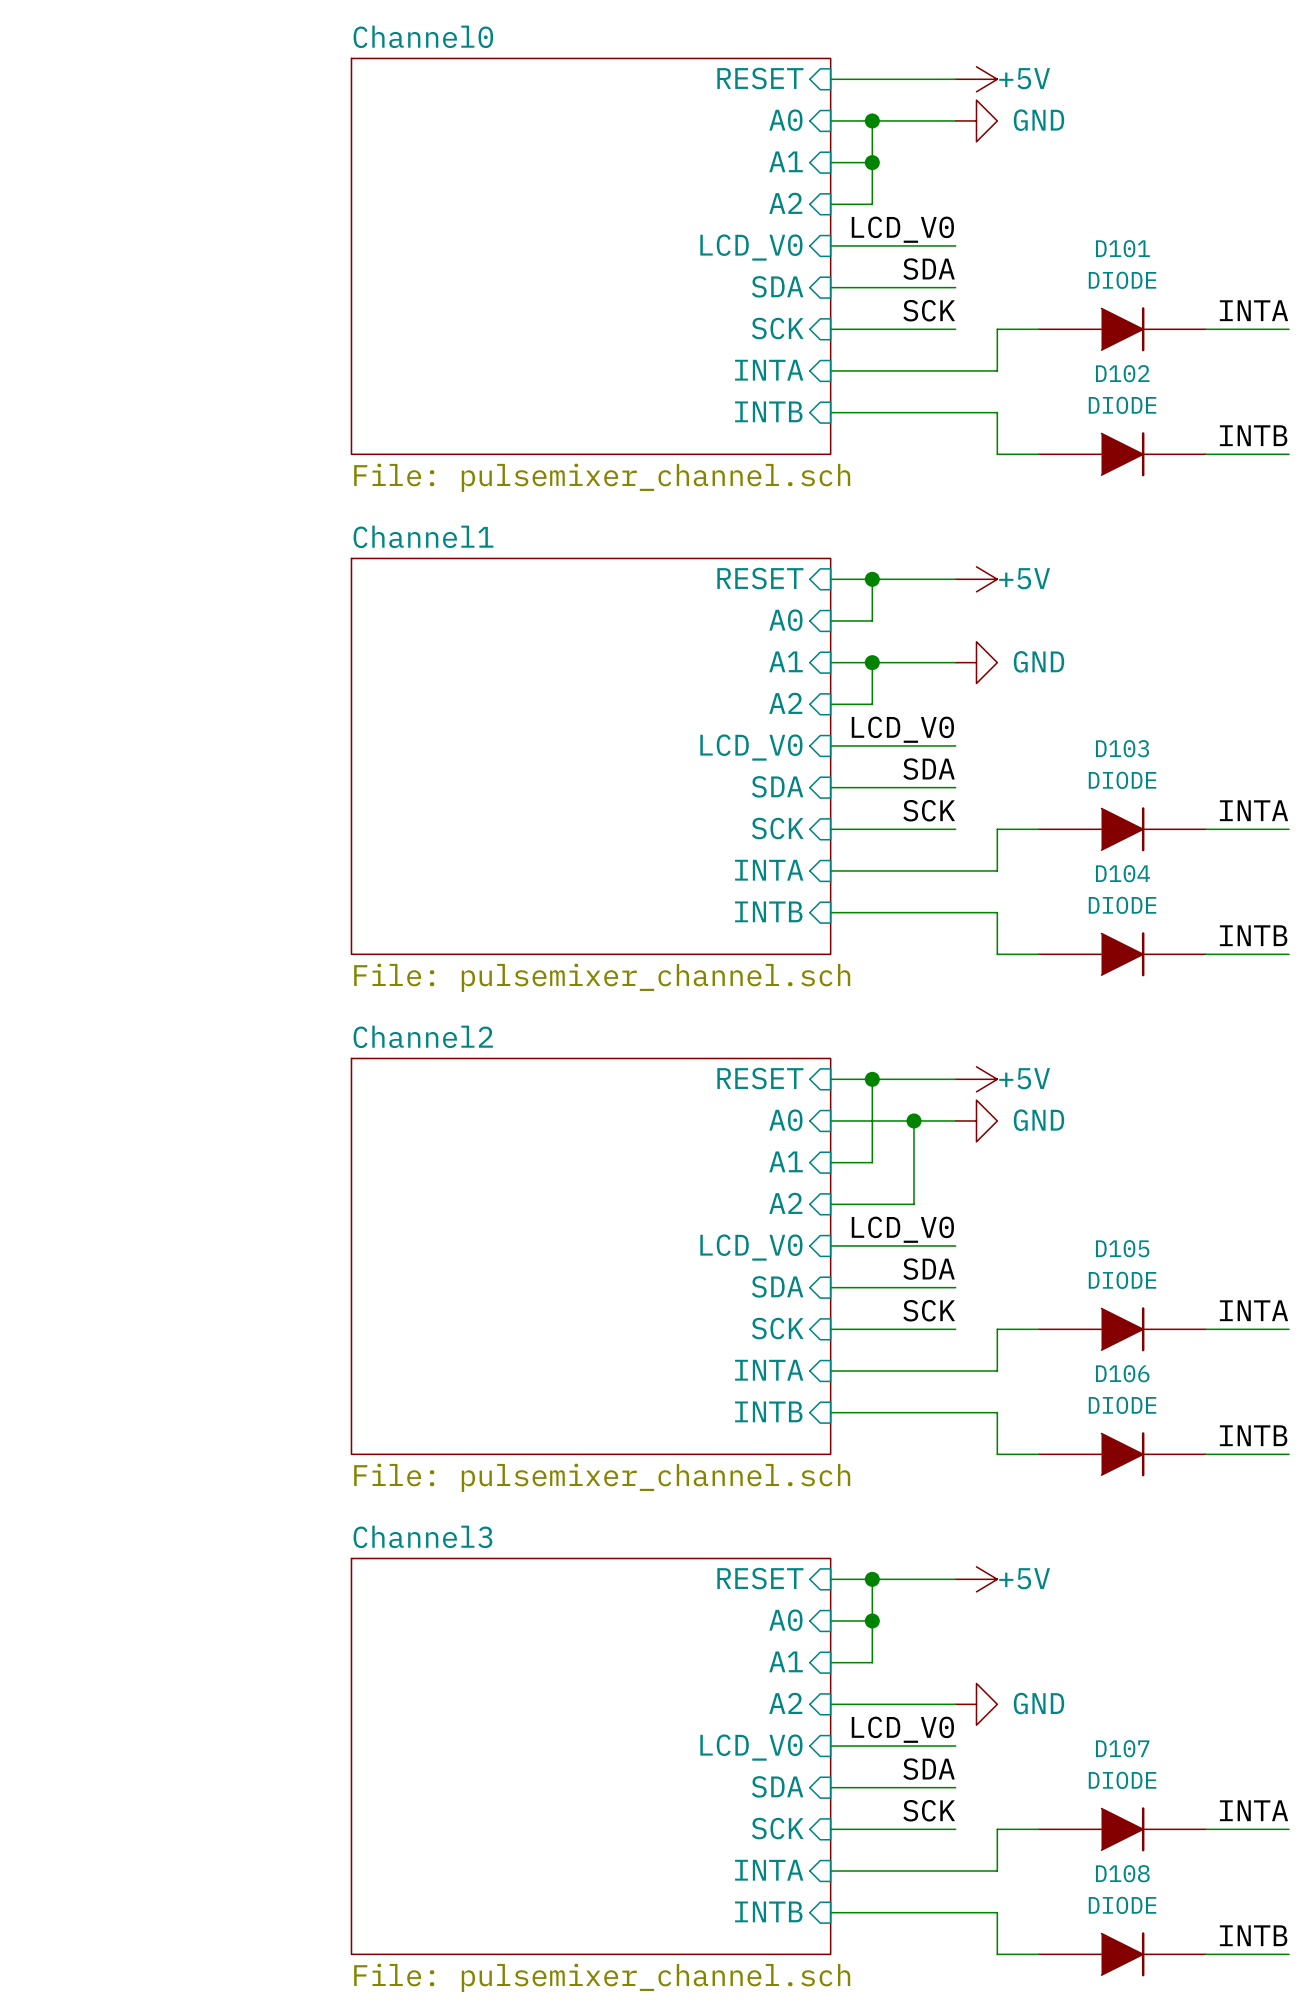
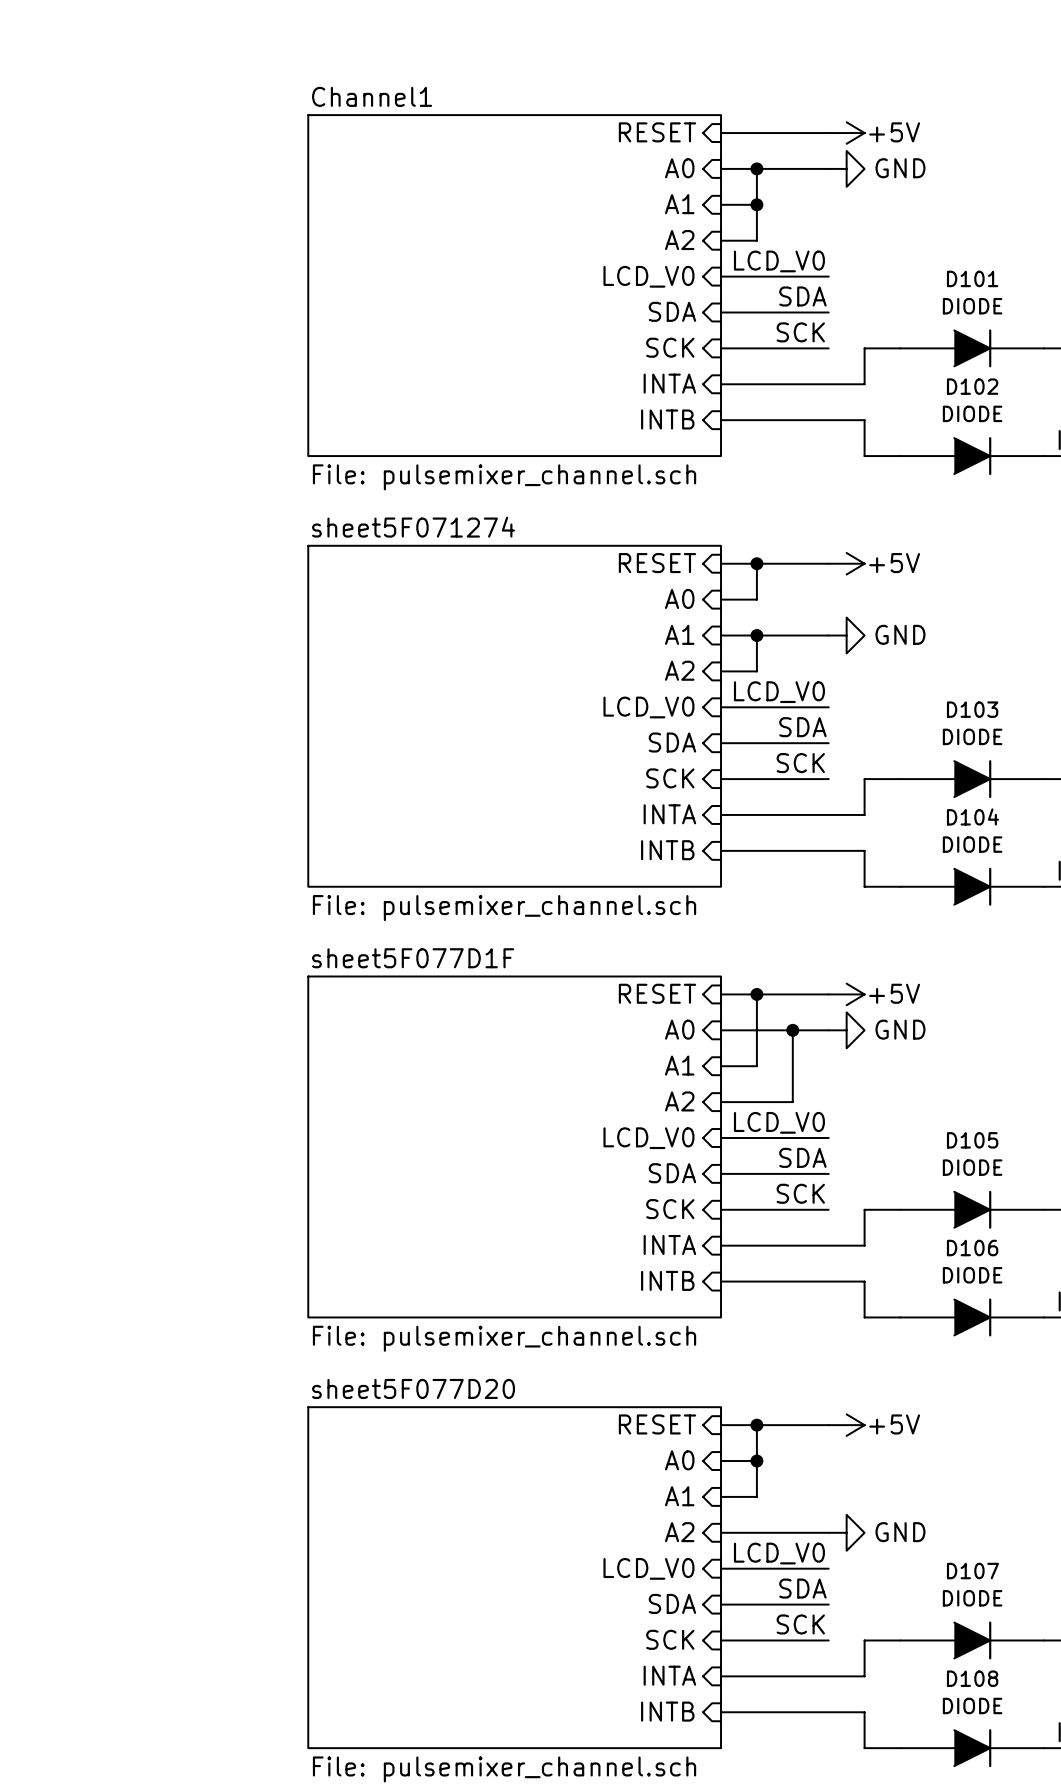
sheet Channel0 name: Channel0 (423, 36) -> Channel1 (372, 96)
sheet Channel1 name: Channel1 (423, 536) -> sheet5F071274 (413, 527)
sheet Channel2 name: Channel2 (423, 1036) -> sheet5F077D1F (413, 958)
sheet Channel3 name: Channel3 (422, 1536) -> sheet5F077D20 (413, 1388)

